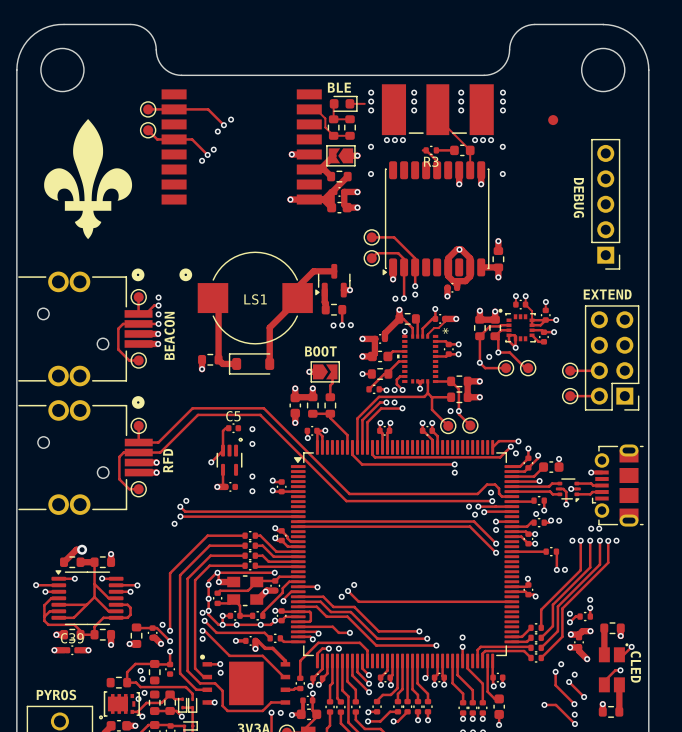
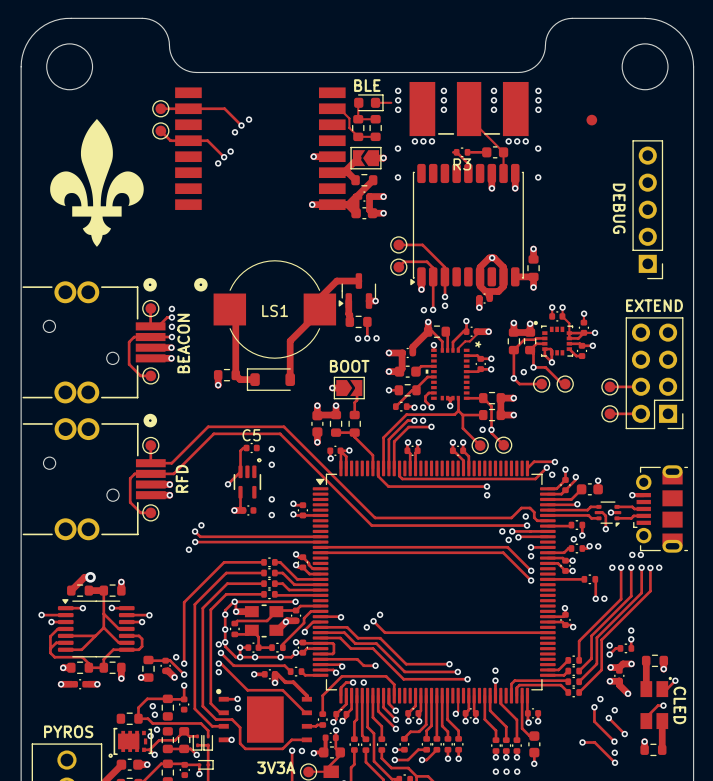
C39 name: C39 (72, 638) -> none

